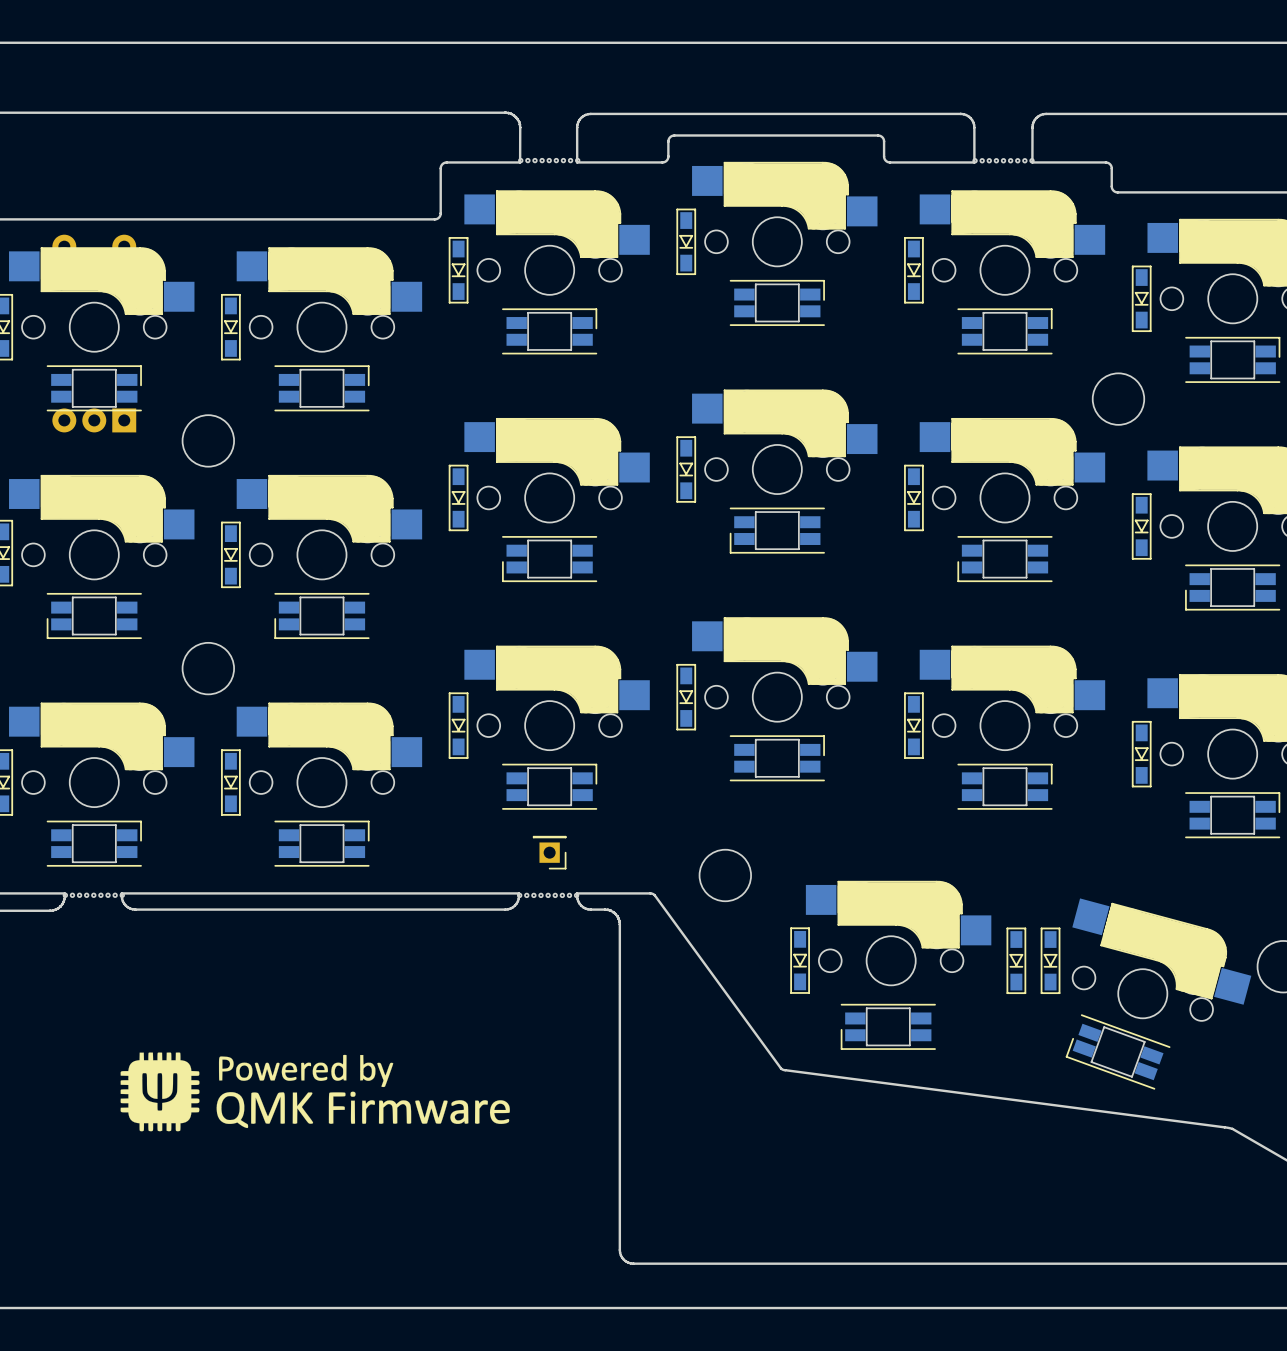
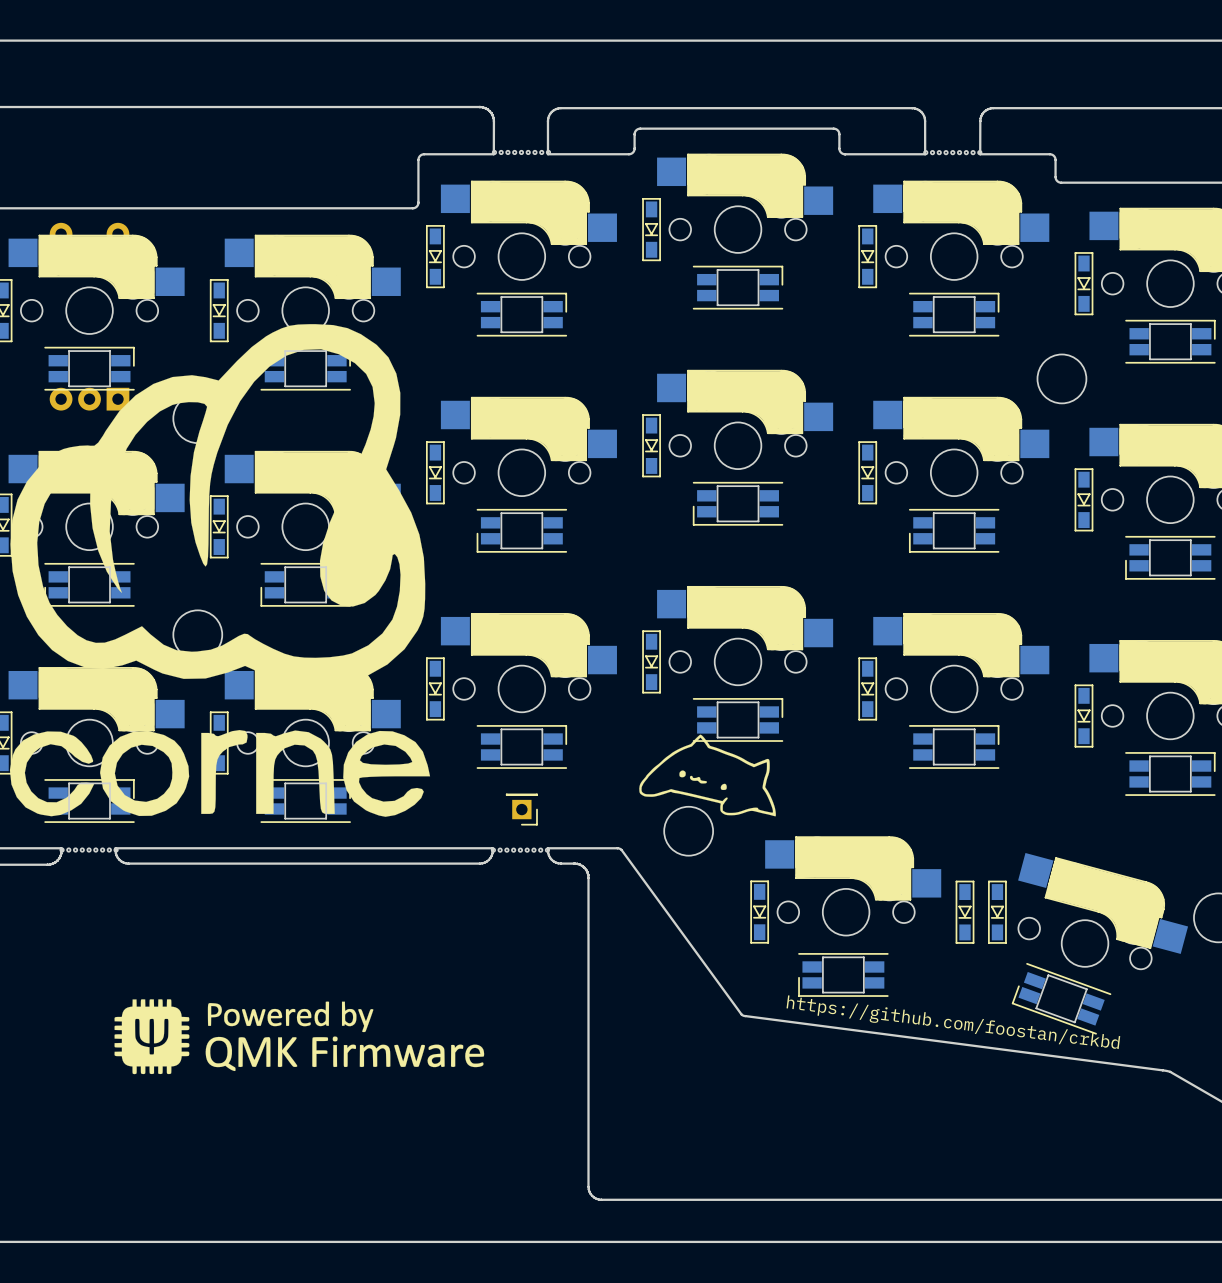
drawing: none -> [9, 324, 431, 817]
drawing: none -> [639, 734, 776, 817]
text: none -> https://github.com/foostan/crkbd (953, 1022)

